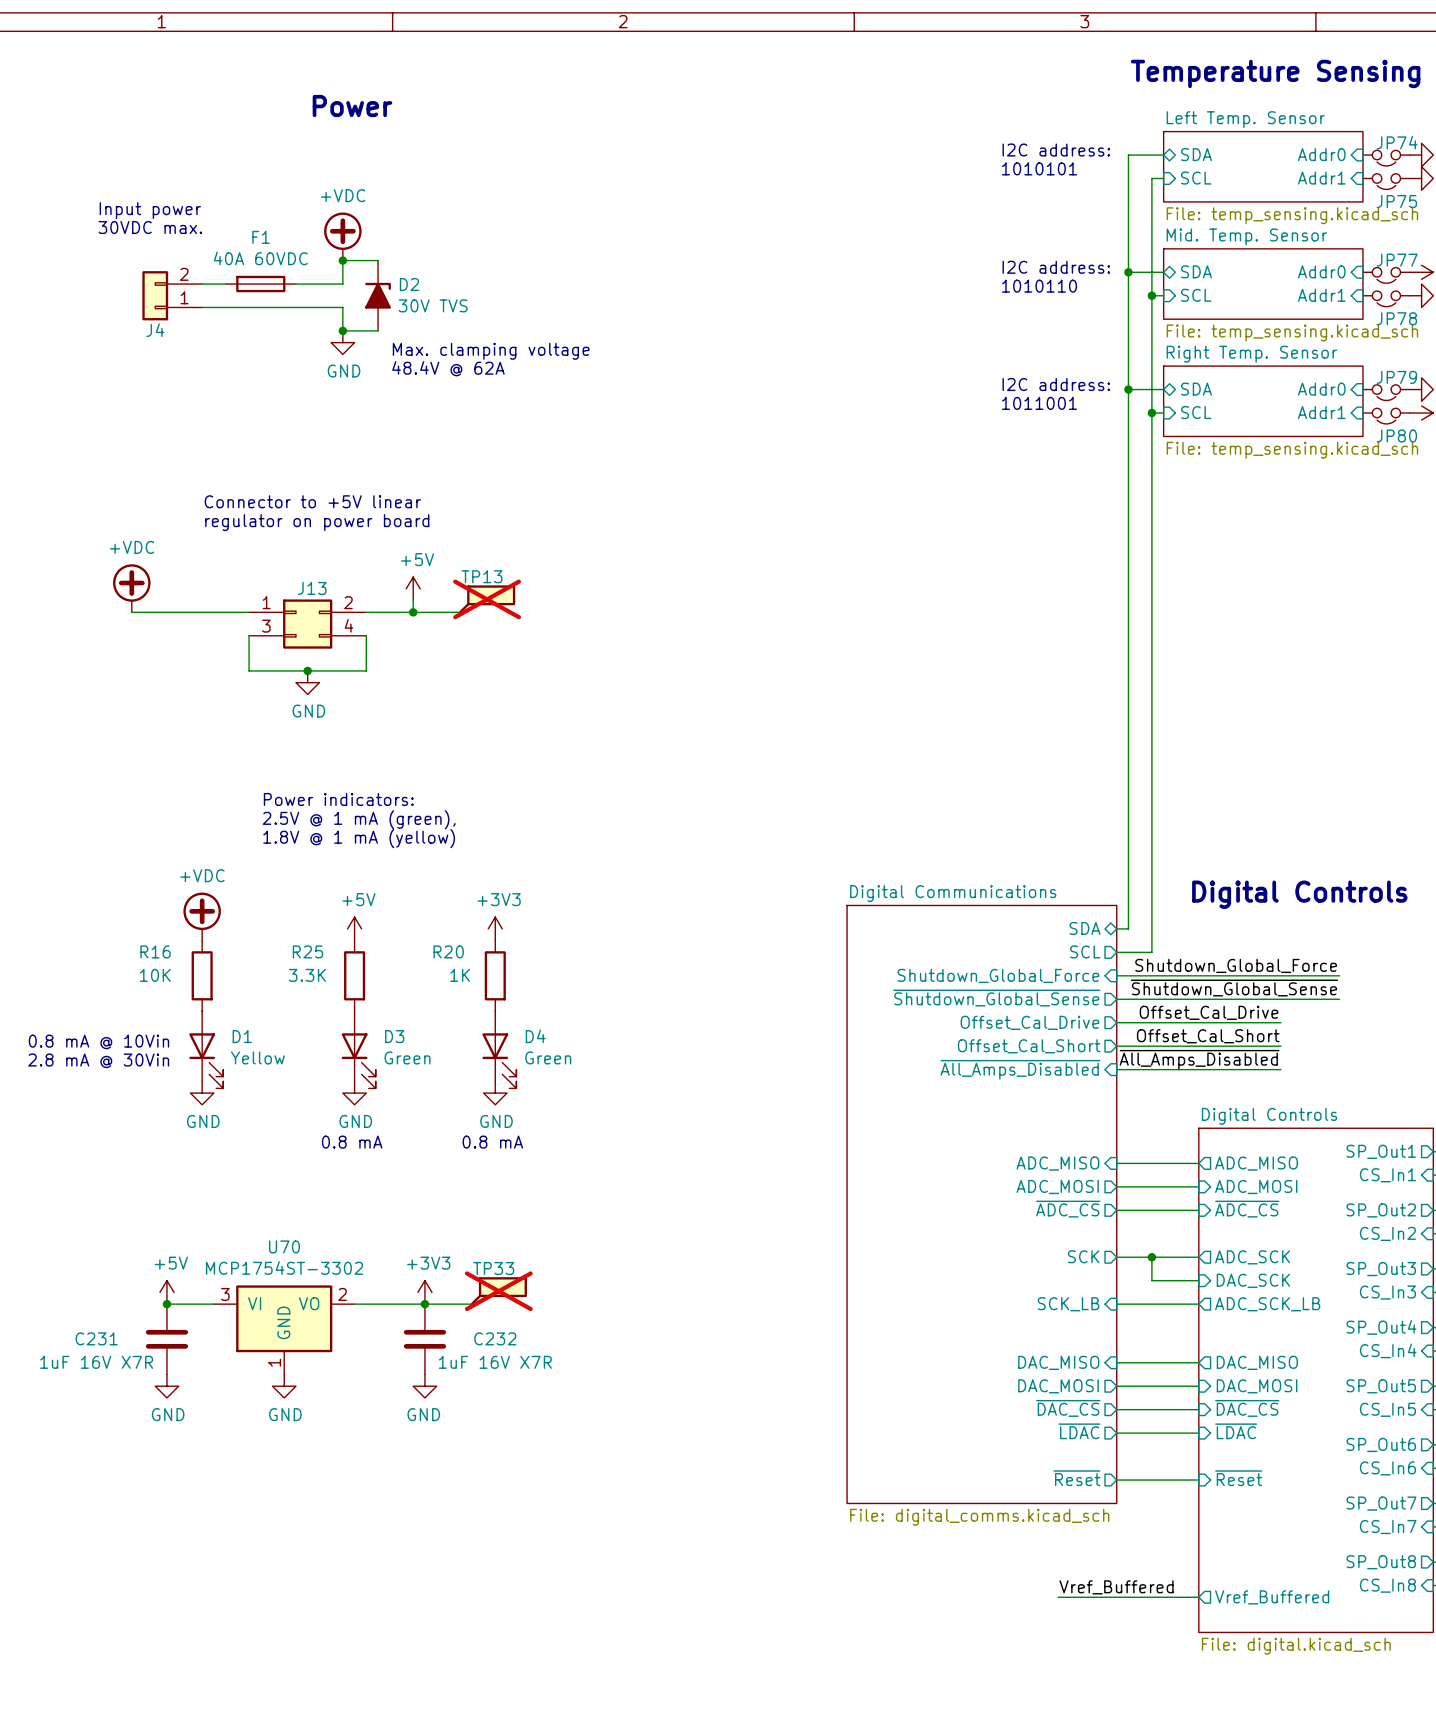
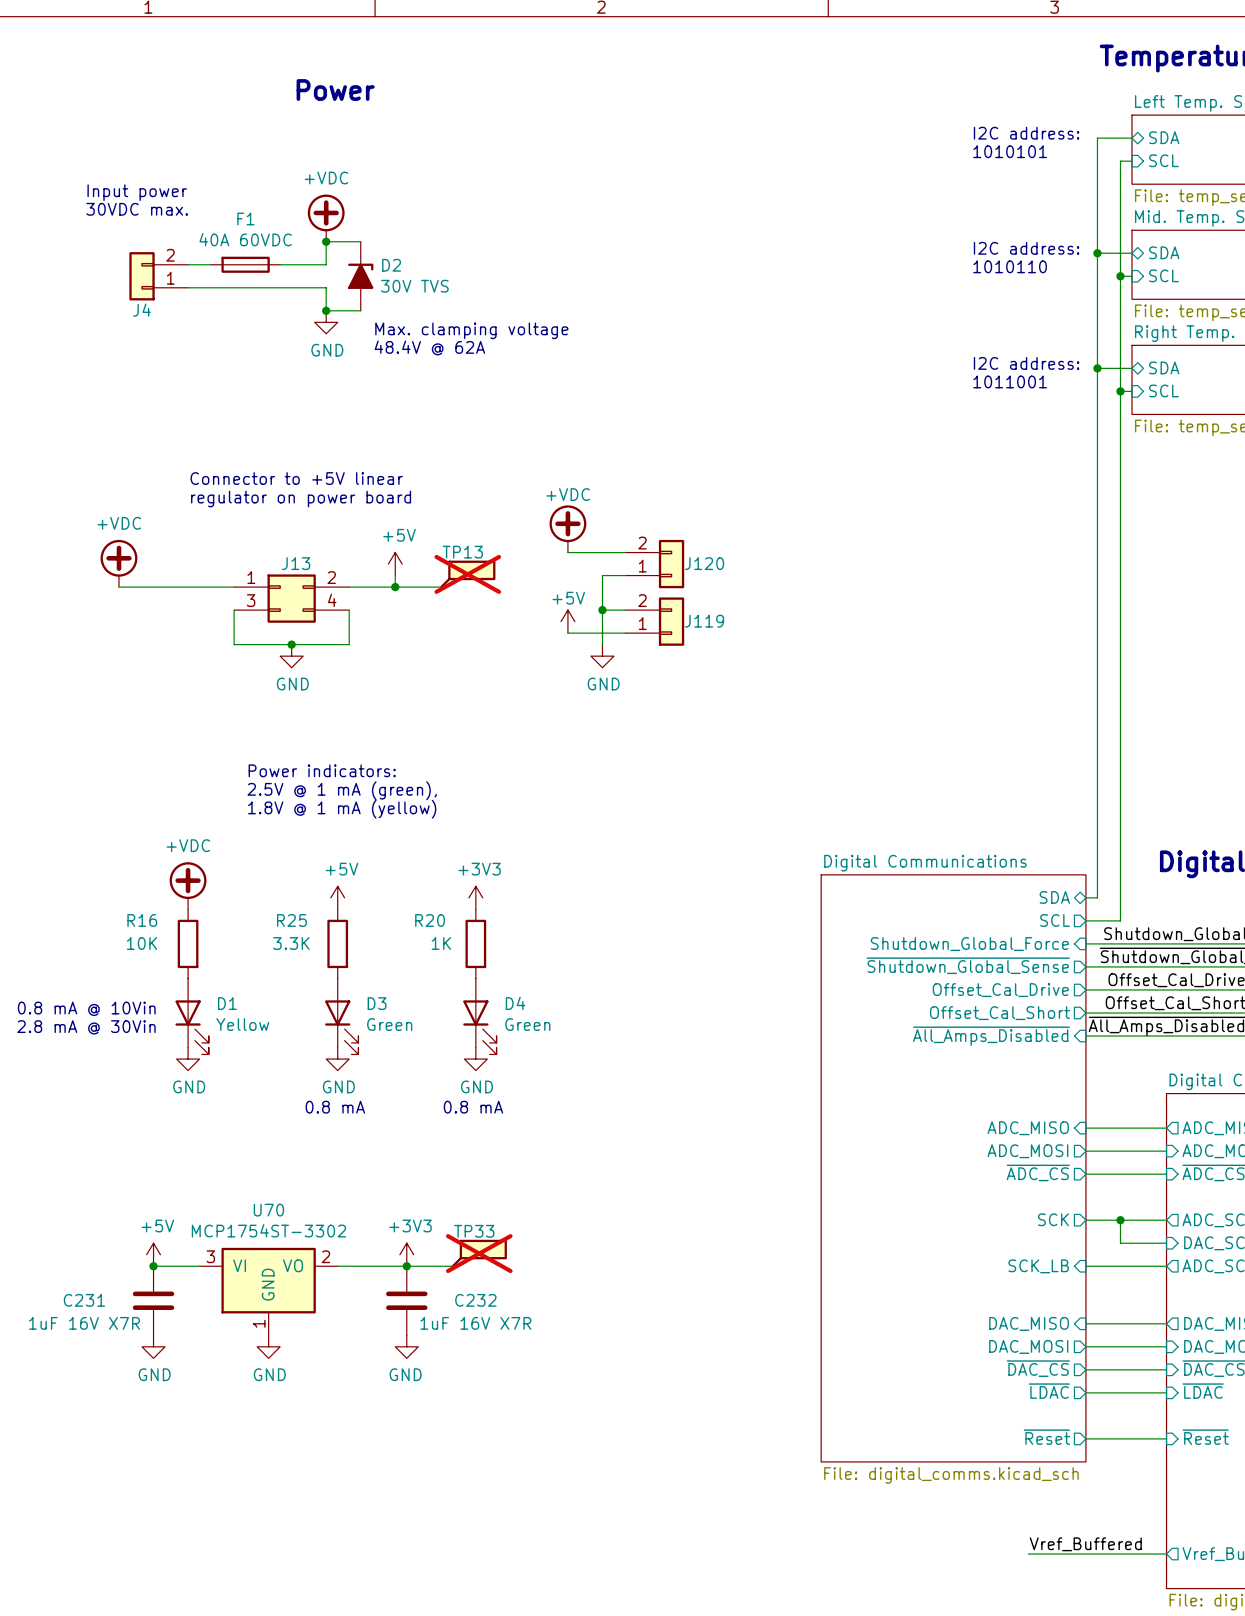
power symbol: none -> +VDC (567, 528)
wire: none -> (567, 552) (625, 552)
J120: none -> (654, 564)
wire: none -> (625, 575) (602, 575) (602, 644)
wire: none -> (602, 610) (625, 610)
junction: none -> (602, 610)
power symbol: none -> +5V (567, 621)
J119: none -> (654, 621)
wire: none -> (567, 633) (625, 633)
power symbol: none -> GND (602, 656)

